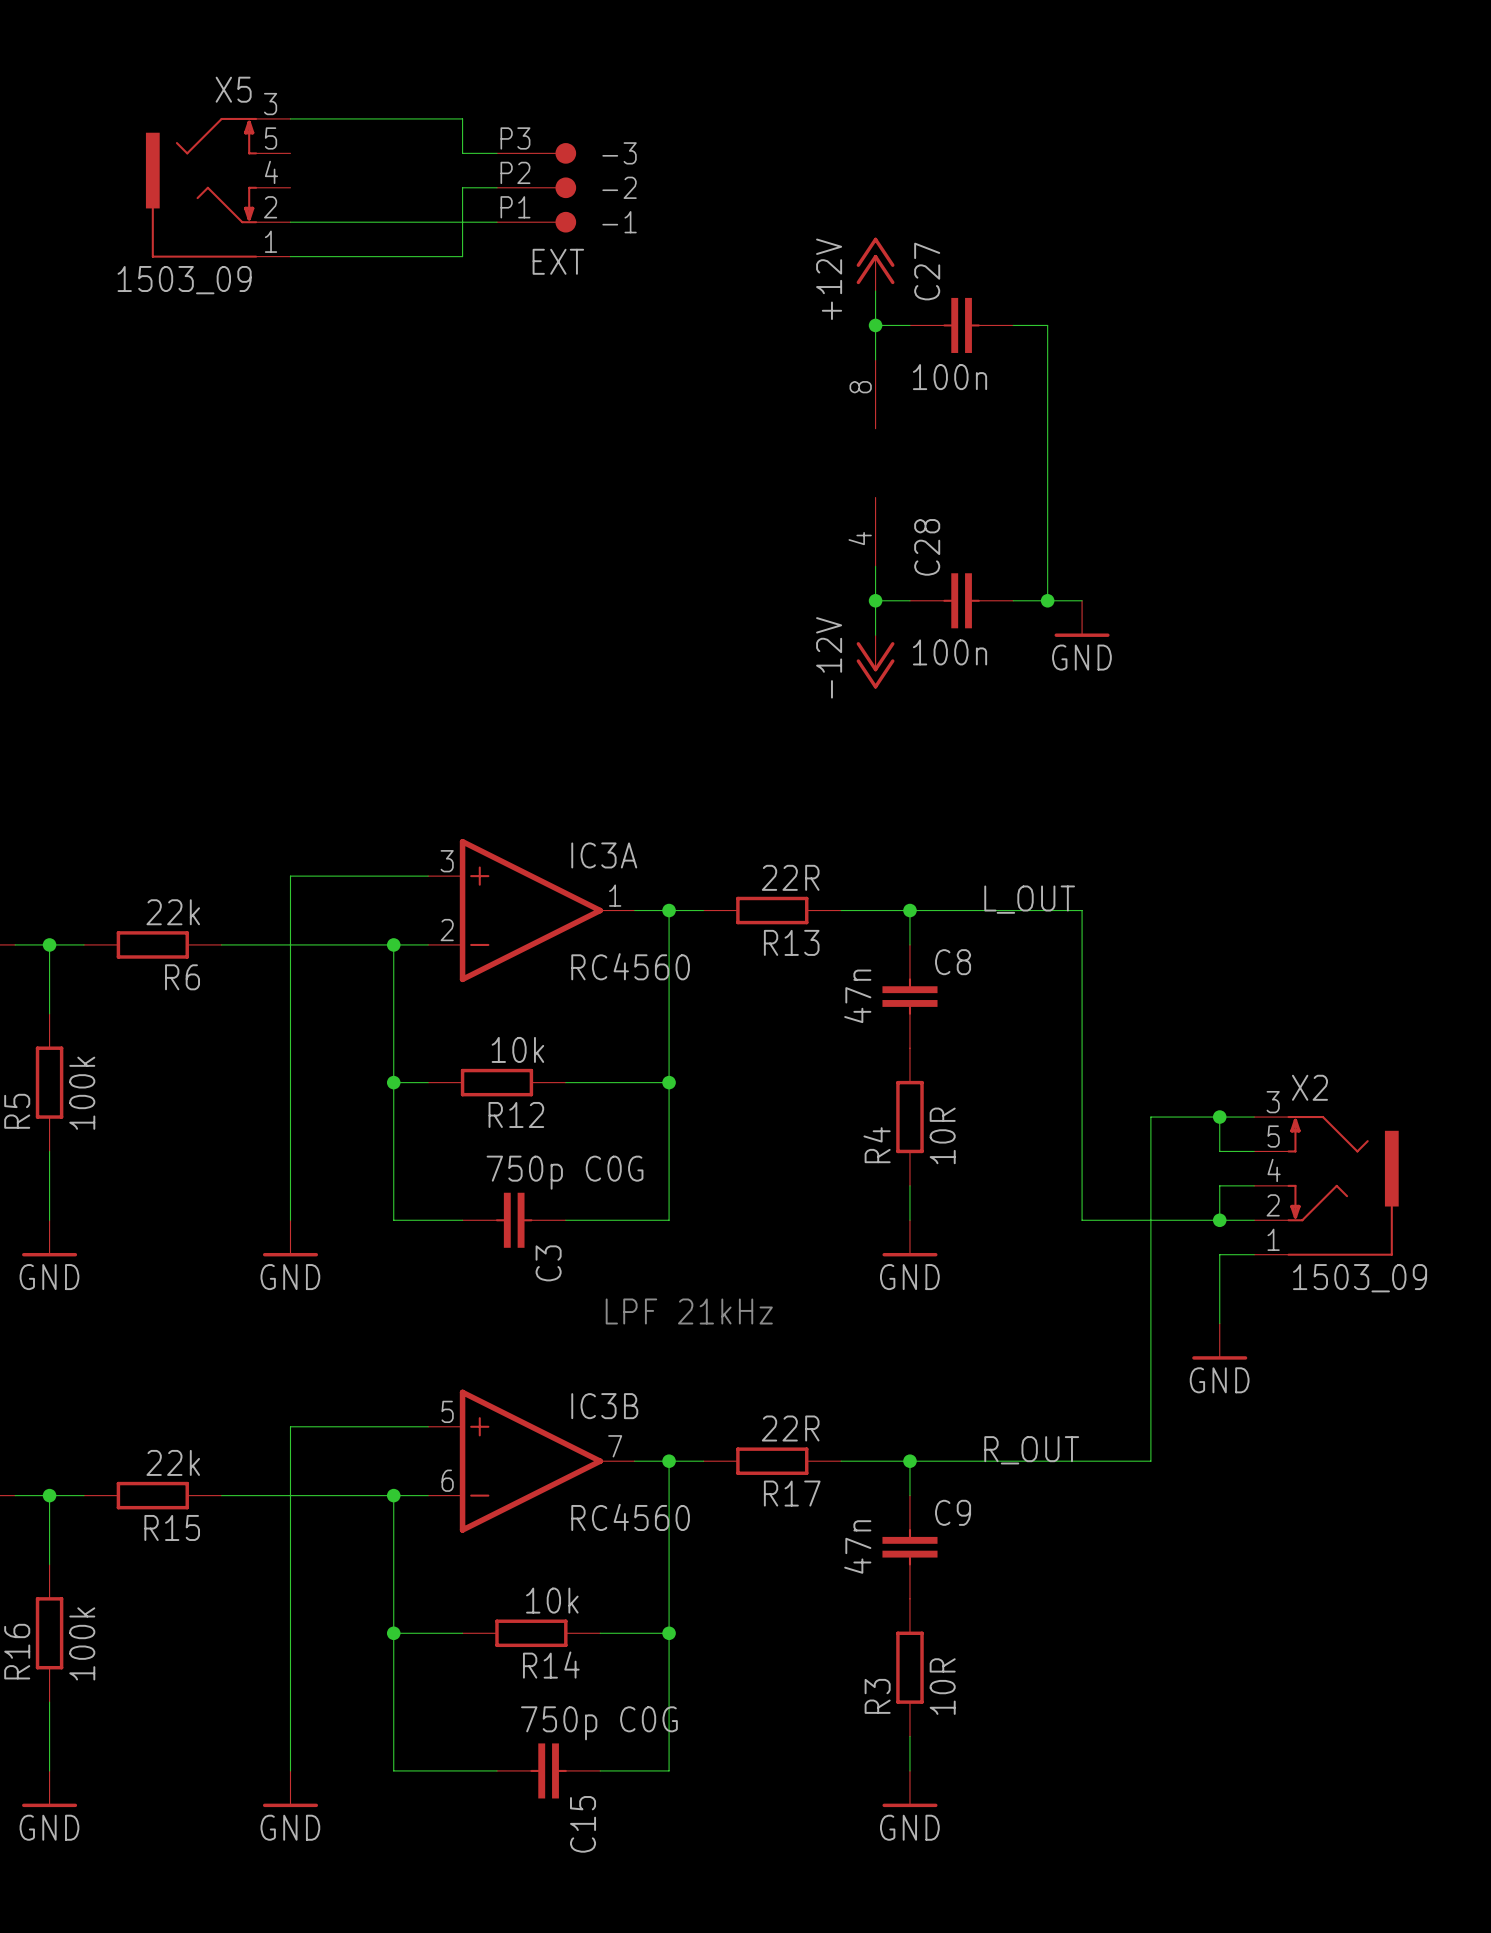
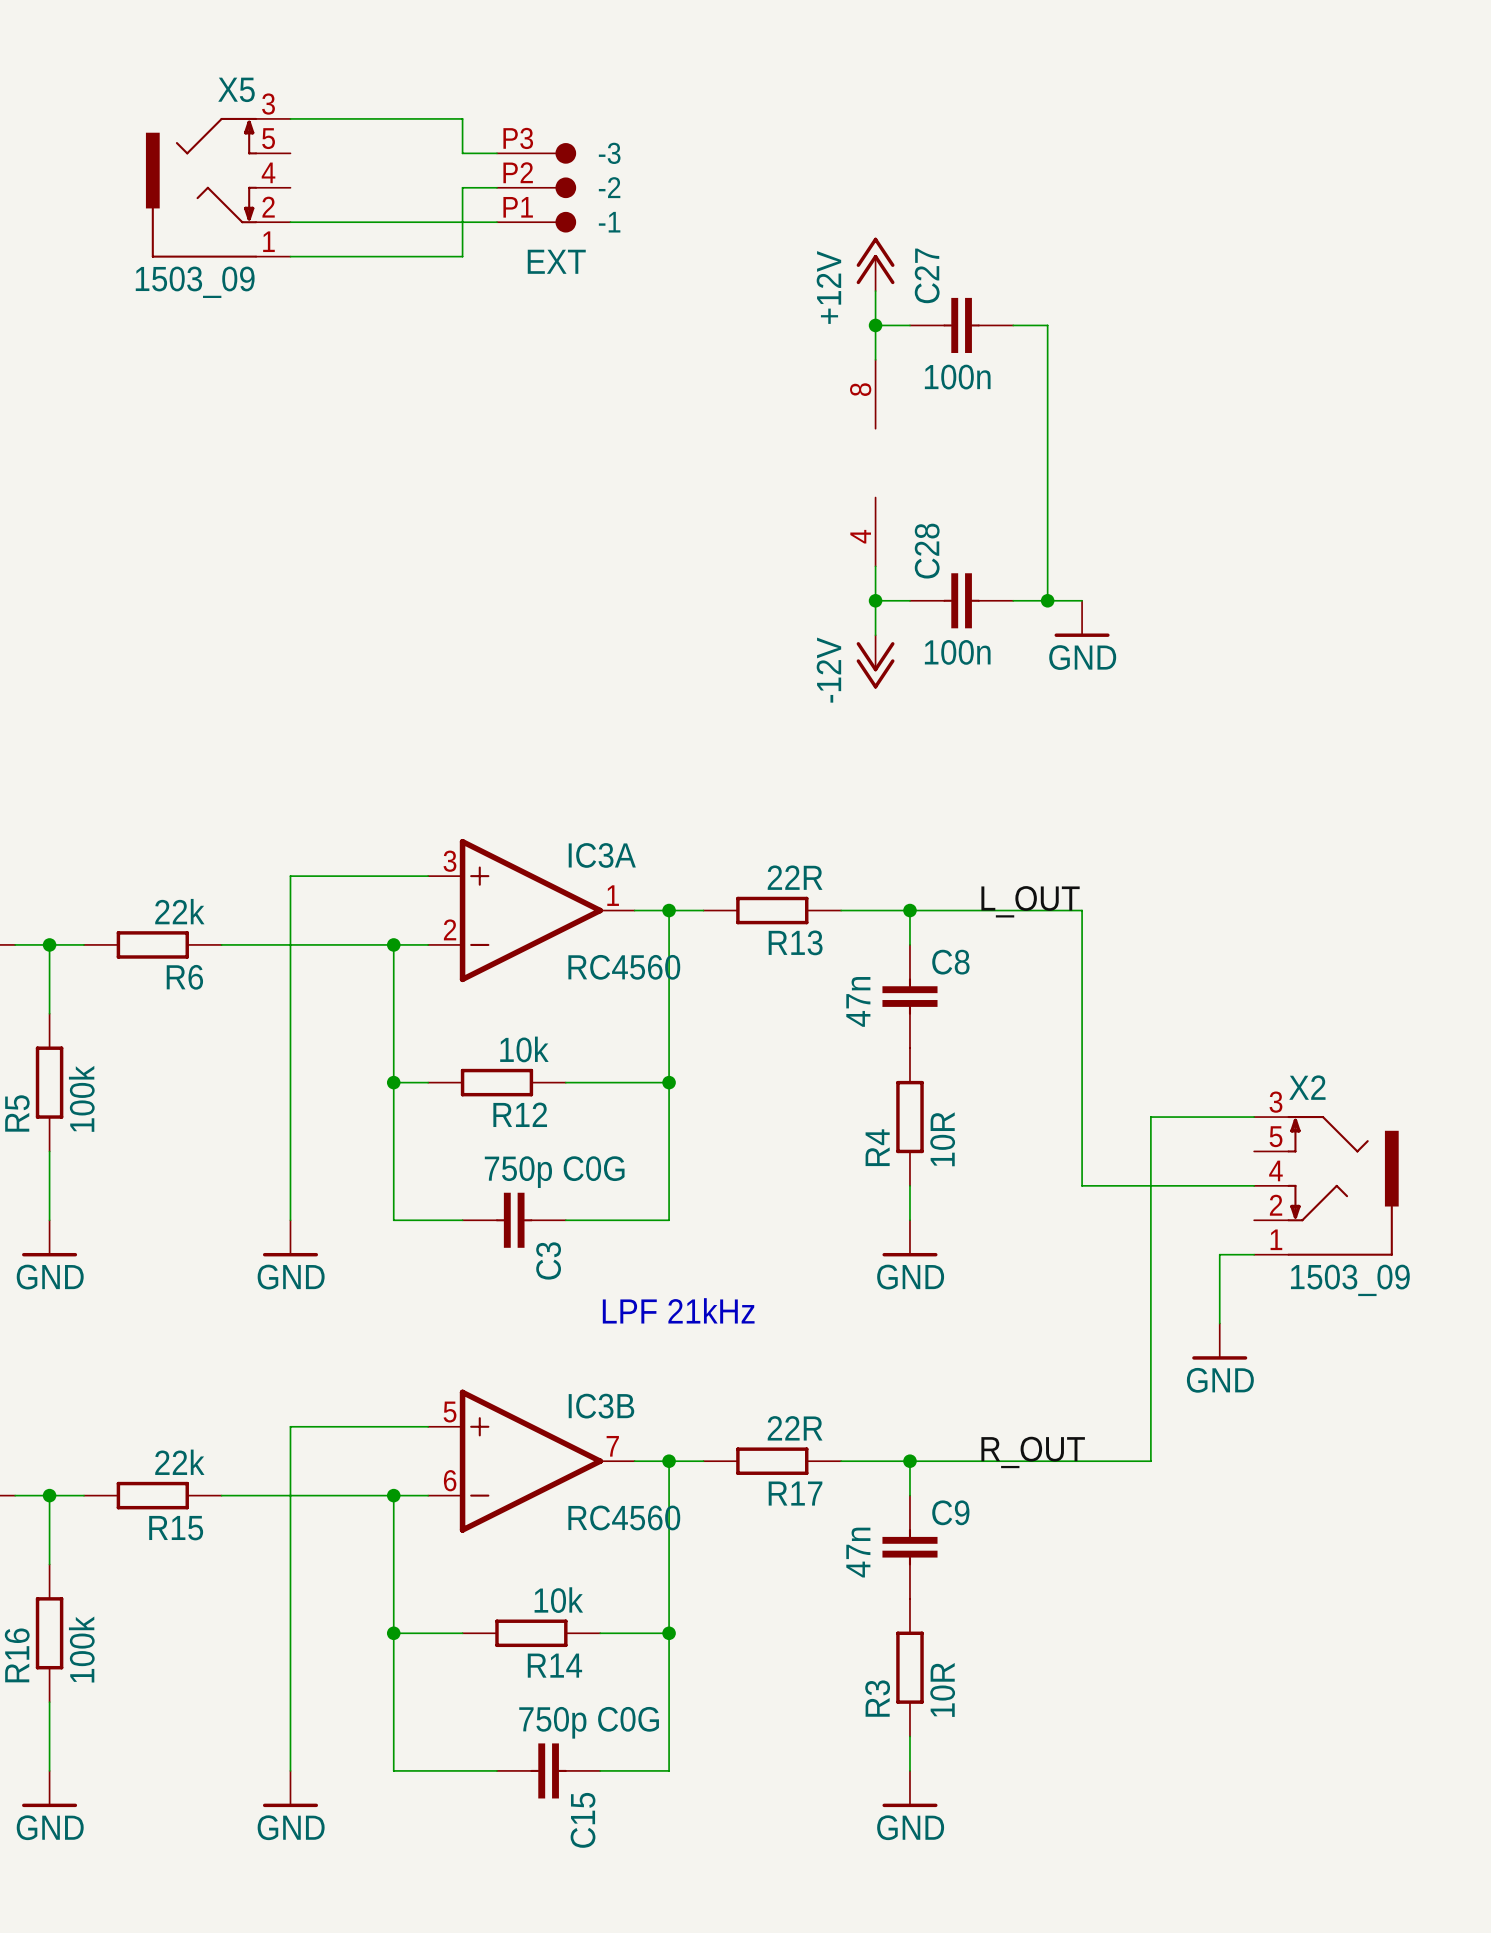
wire: (1219, 1117) (1219, 1151) (1254, 1151) -> none
junction: (1219, 1117) -> none
wire: (1082, 1185) (1082, 1220) (1254, 1220) -> (1082, 1185) (1219, 1185)
wire: (1219, 1185) (1219, 1220) -> none
junction: (1219, 1220) -> none

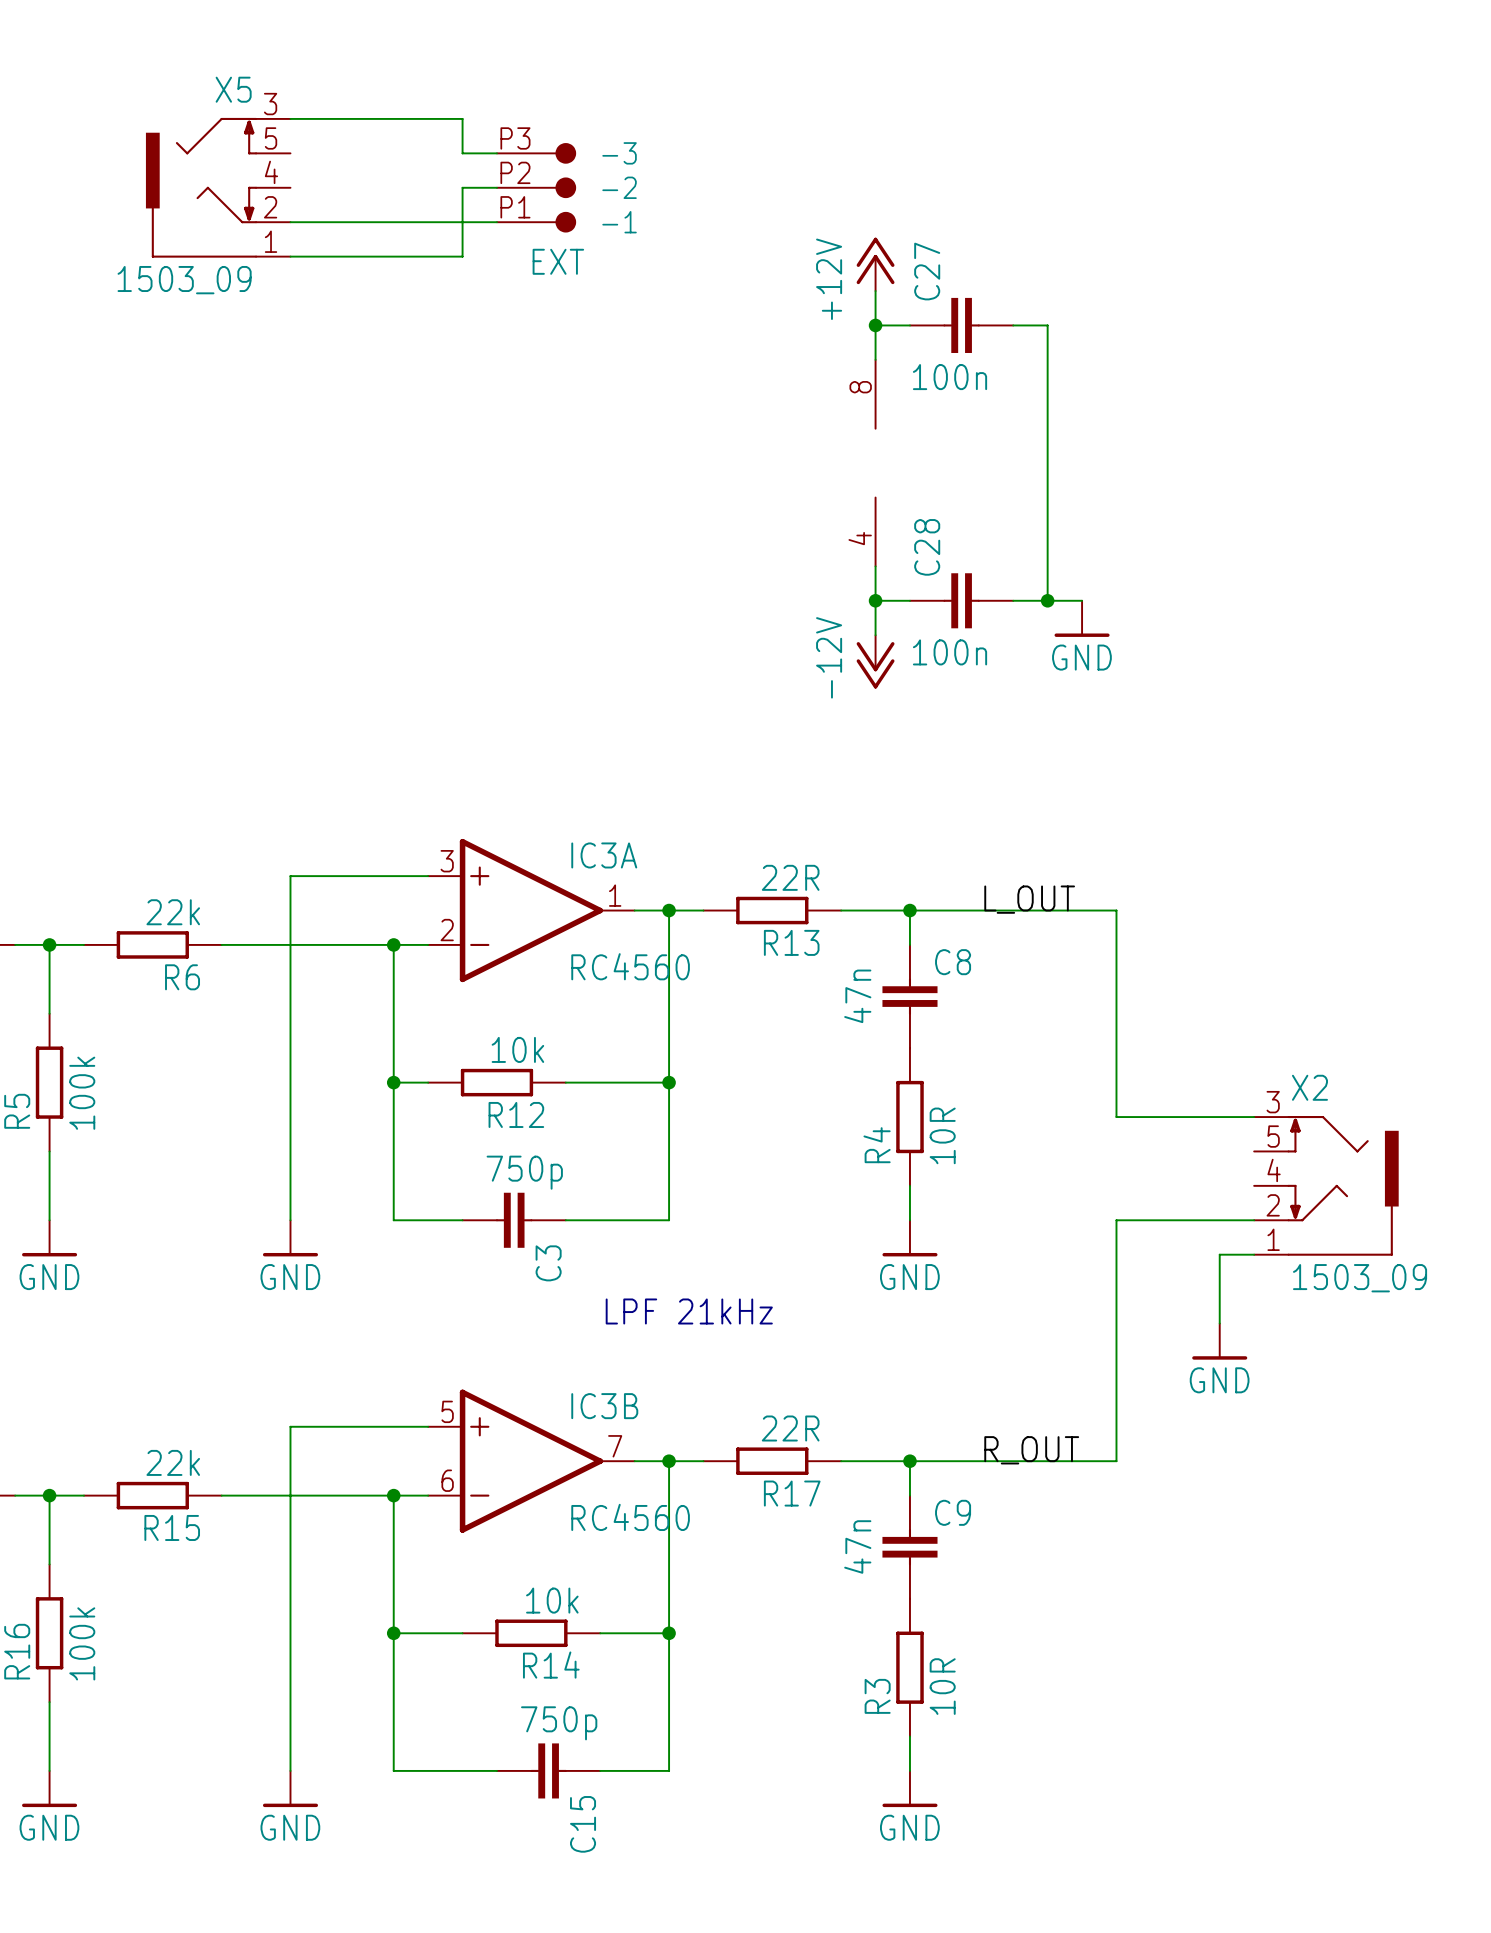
wire: (1082, 910) (1082, 1185) (1254, 1185) -> (1082, 910) (1116, 910) (1116, 1117) (1150, 1117)
wire: (1150, 1117) (1150, 1461) (1116, 1461) -> (1254, 1220) (1116, 1220) (1116, 1461)
C3 value: 750p C0G (554, 1172) -> 750p (524, 1172)
C15 value: 750p C0G (589, 1722) -> 750p (559, 1723)

